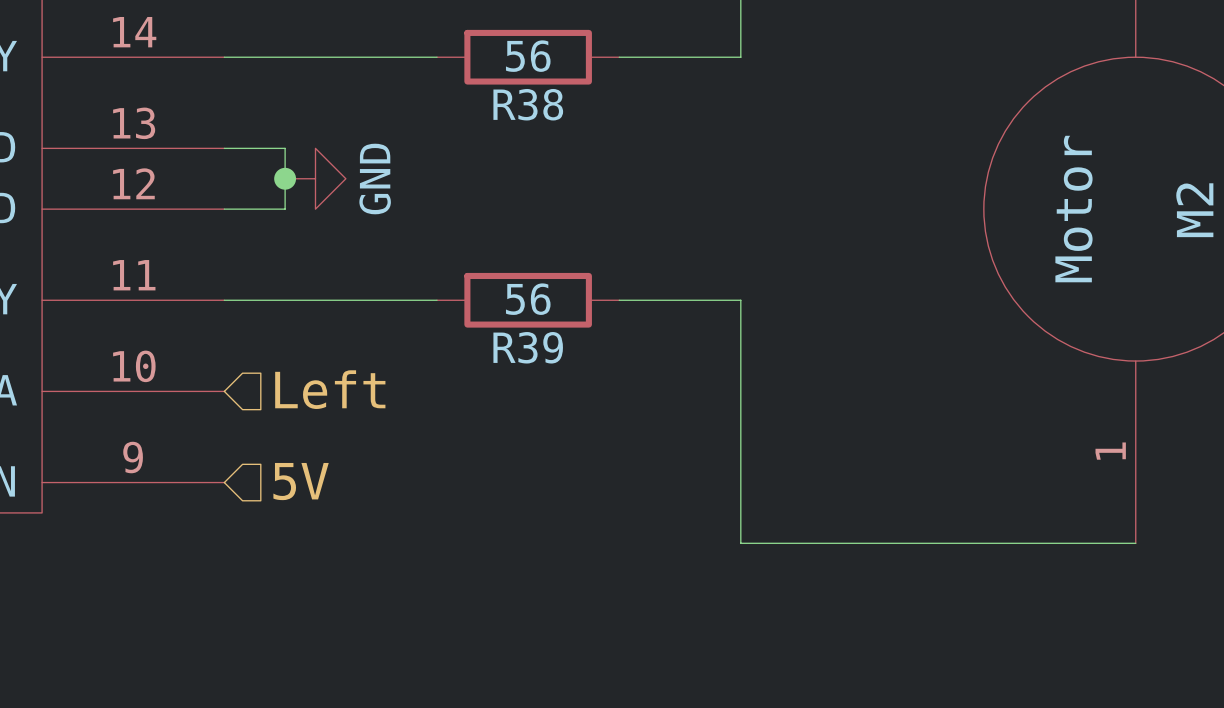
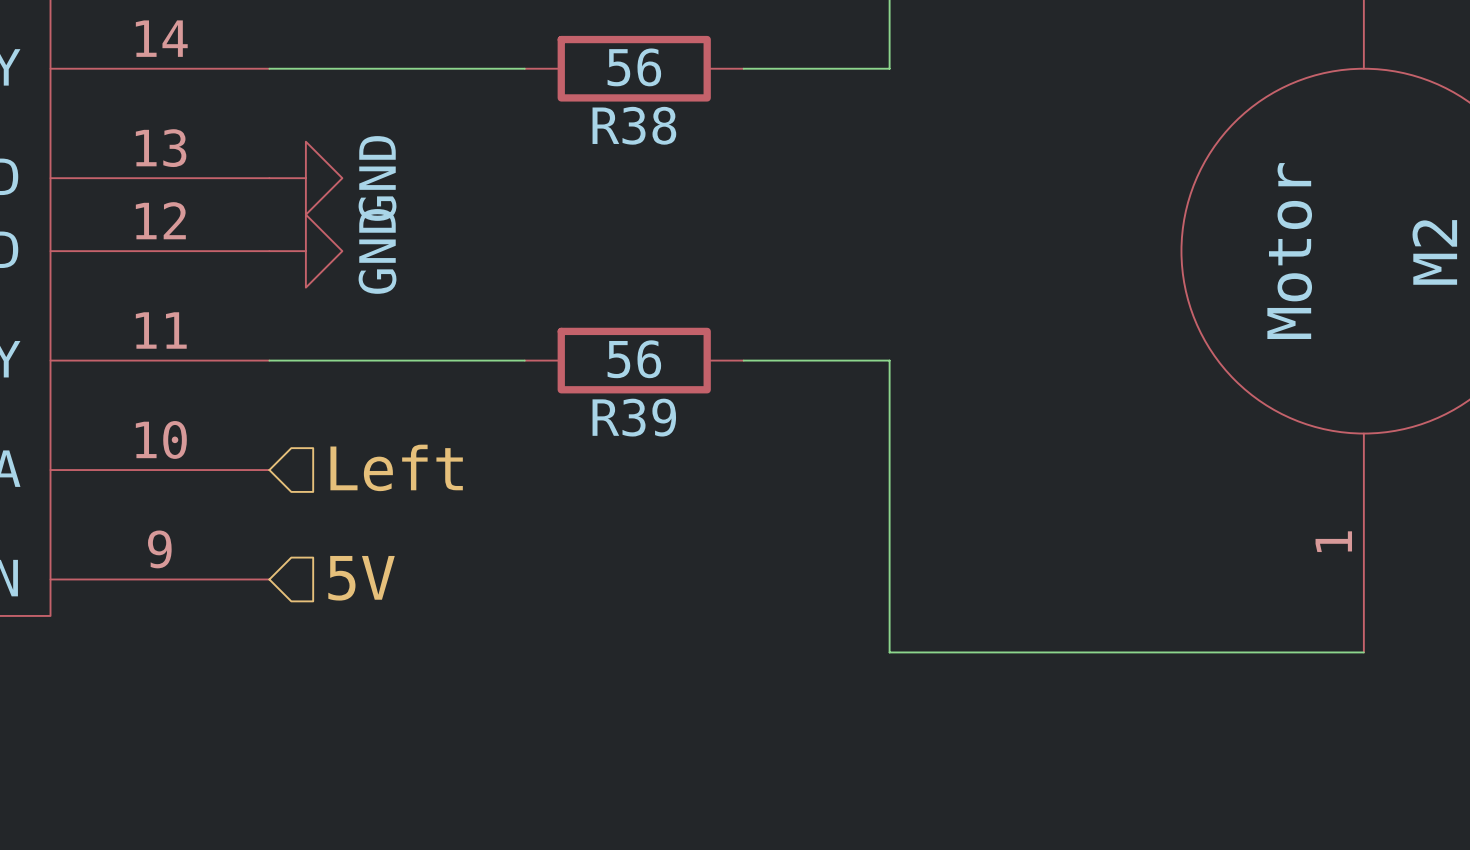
wire: (224, 148) (285, 148) (285, 209) (224, 209) -> none
power symbol: none -> GND (305, 178)
junction: (285, 178) -> none
power symbol: GND (315, 178) -> none
power symbol: none -> GND (305, 251)

